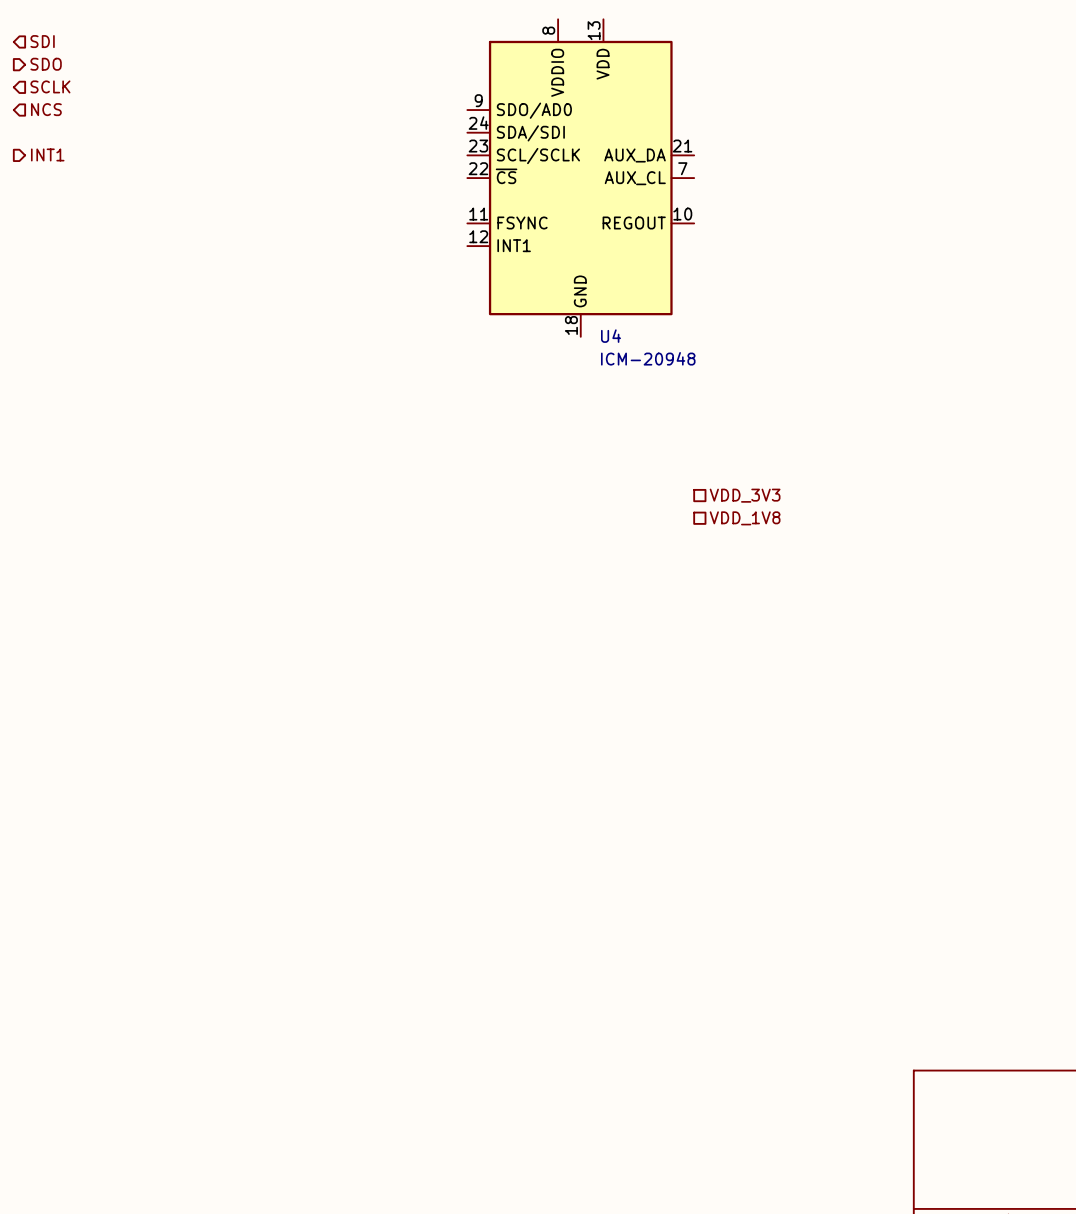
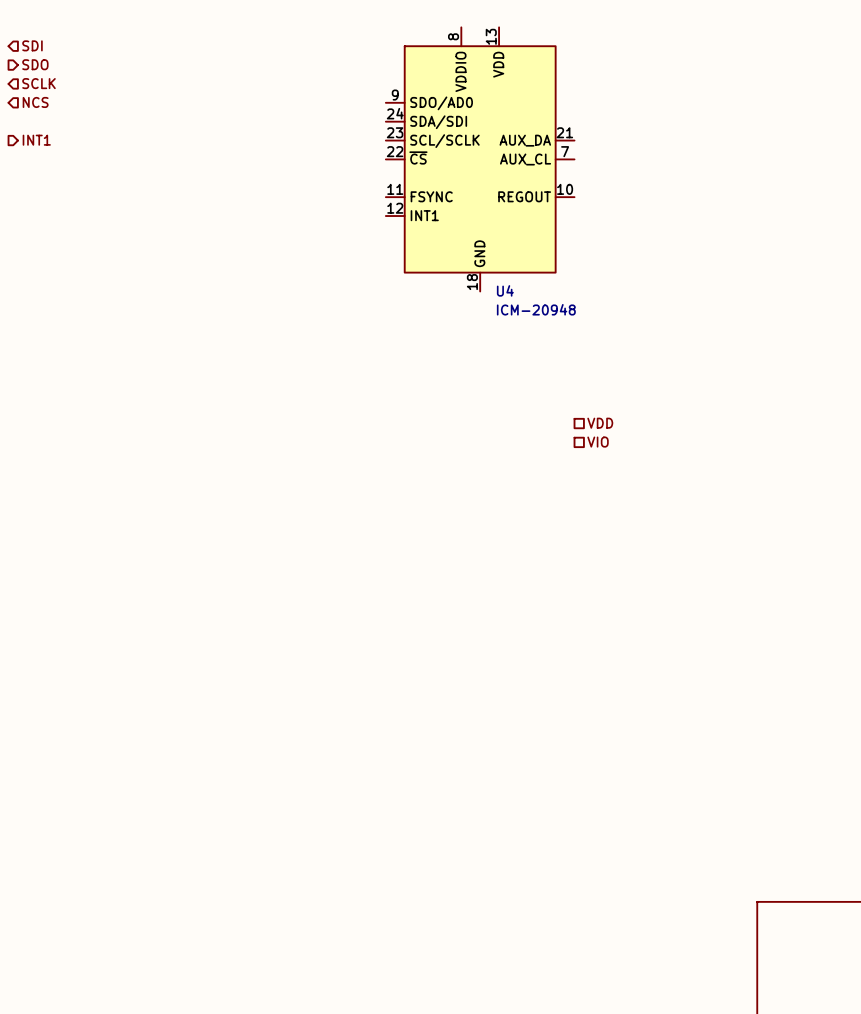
hierarchical label: VDD_3V3 (745, 495) -> VDD (600, 423)
hierarchical label: VDD_1V8 (745, 518) -> VIO (598, 442)

